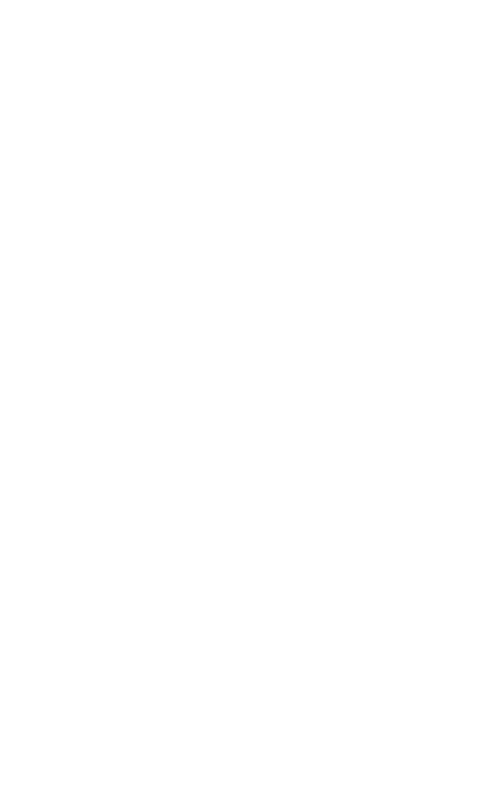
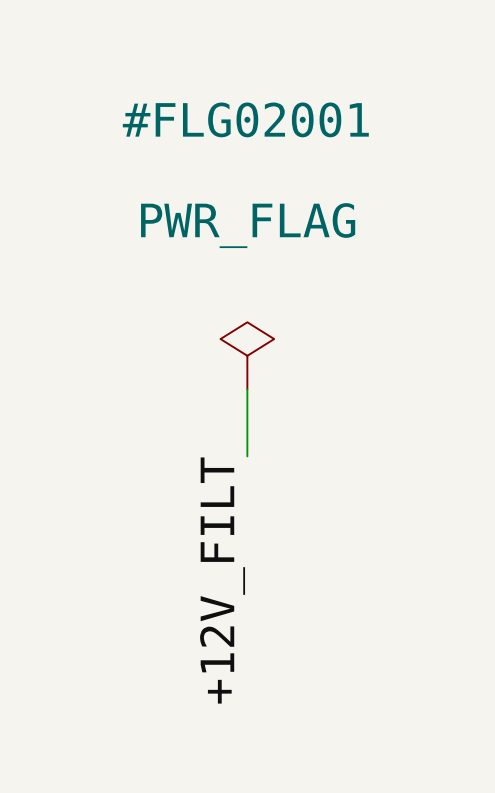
#FLG02001: none -> PWR_FLAG (247, 355)
wire: none -> (247, 389) (247, 456)
label: none -> +12V_FILT (222, 580)

